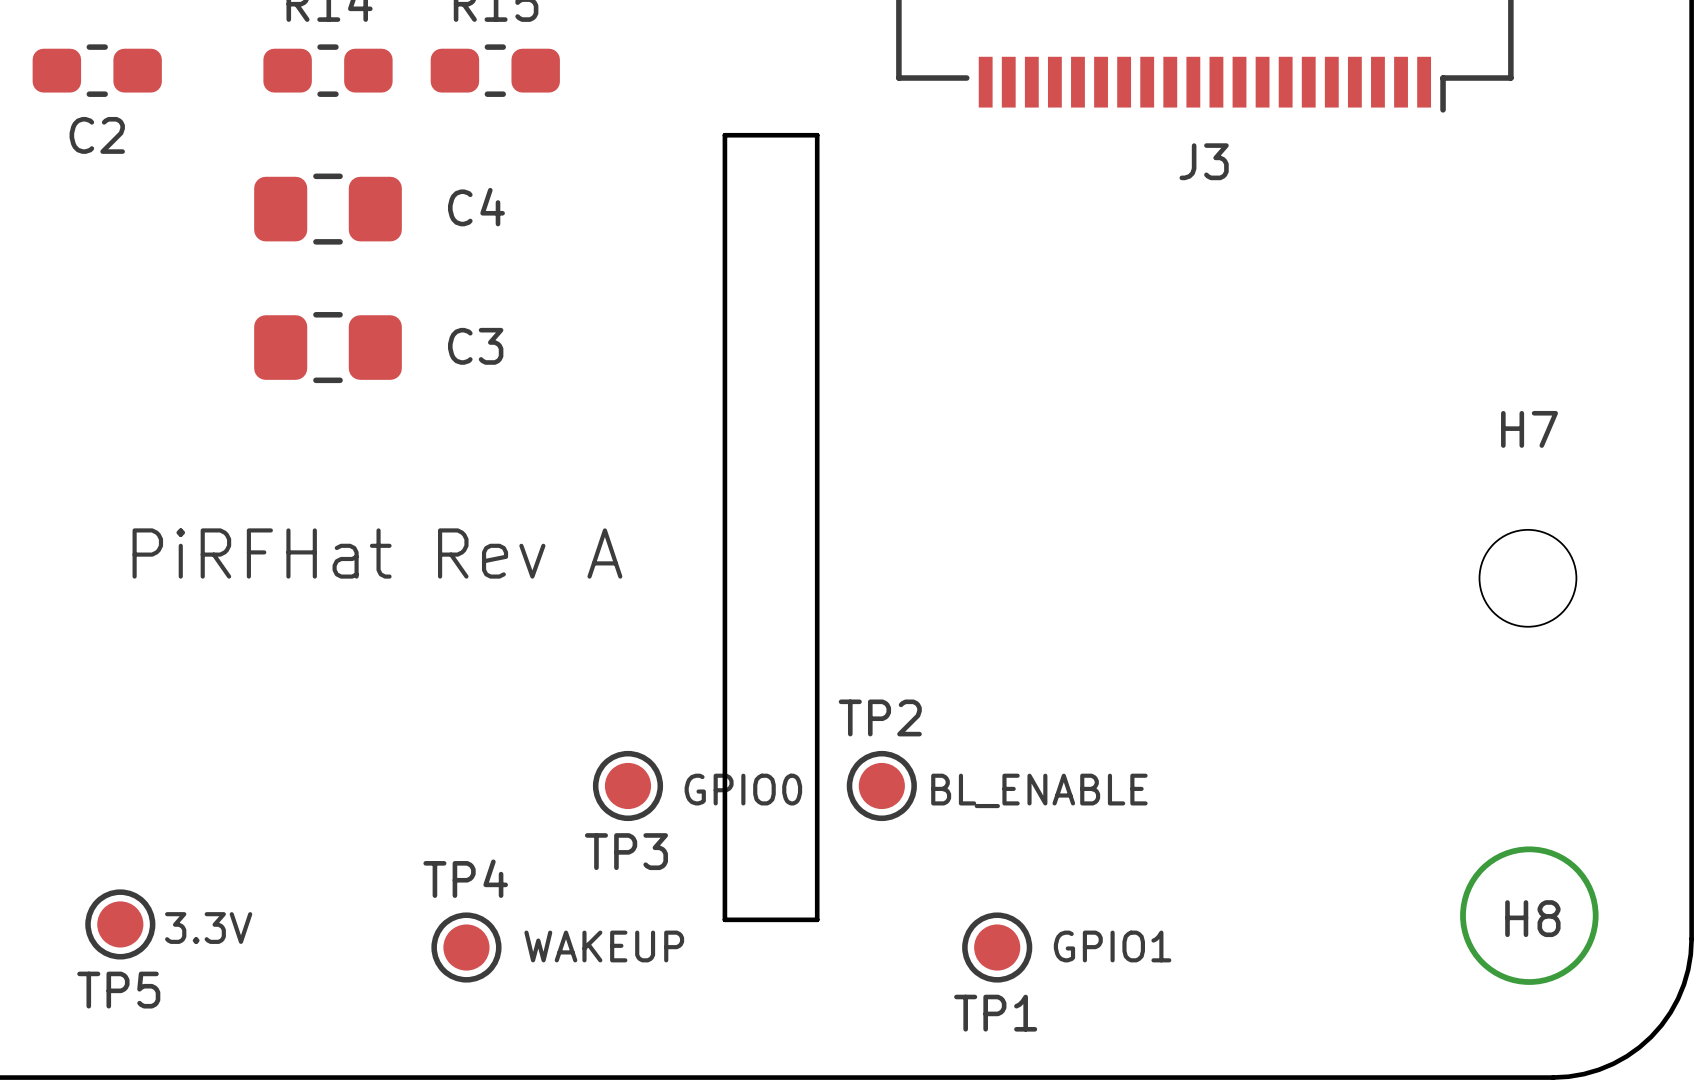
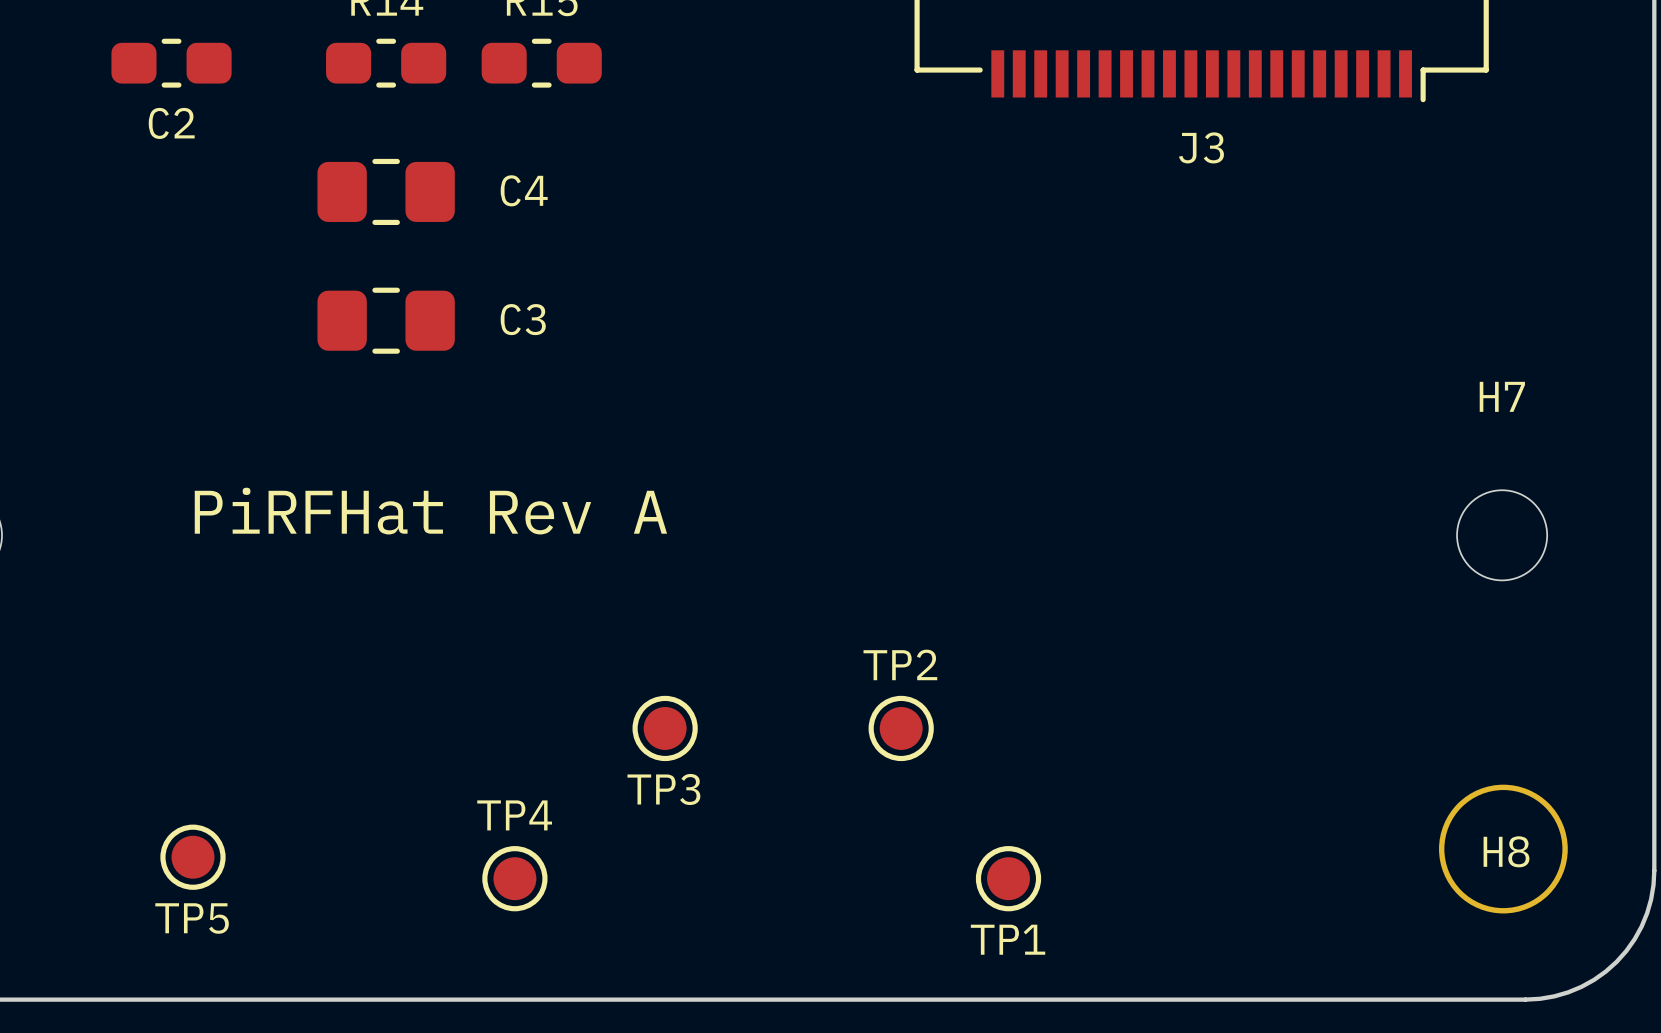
board edge: (724, 135) (724, 919) (817, 919) (817, 135) (724, 135) -> none
text: GPIO0 (743, 789) -> none
text: BL_ENABLE (1039, 790) -> none
text: 3.3V (208, 928) -> none
text: WAKEUP (604, 946) -> none
text: GPIO1 (1112, 946) -> none

